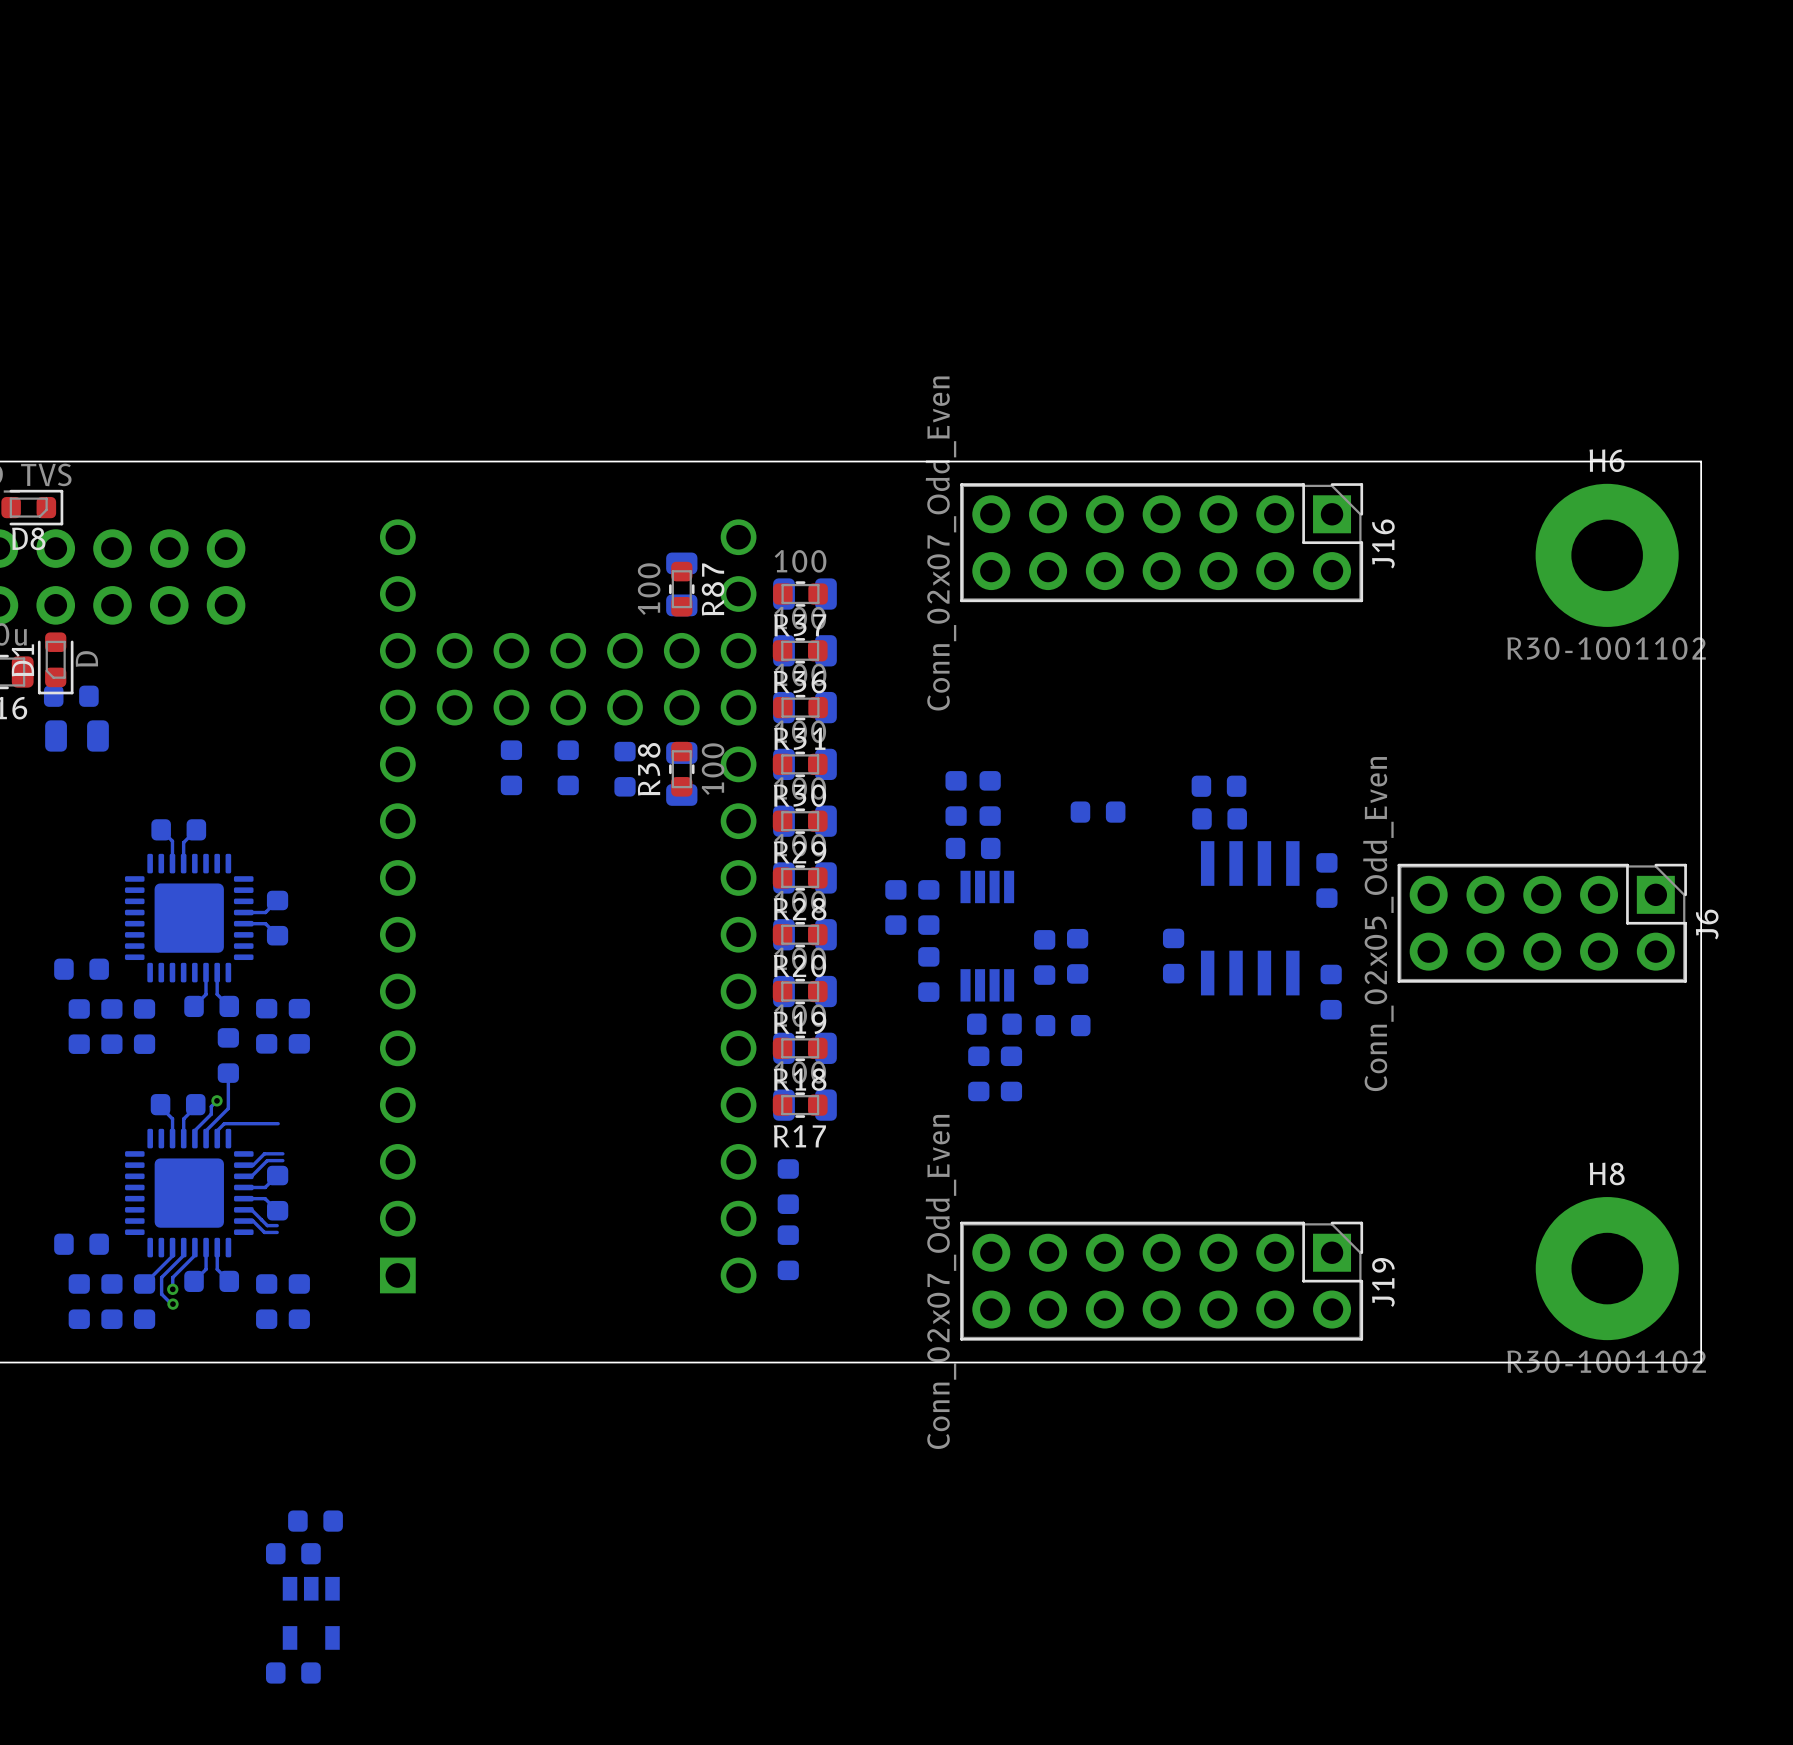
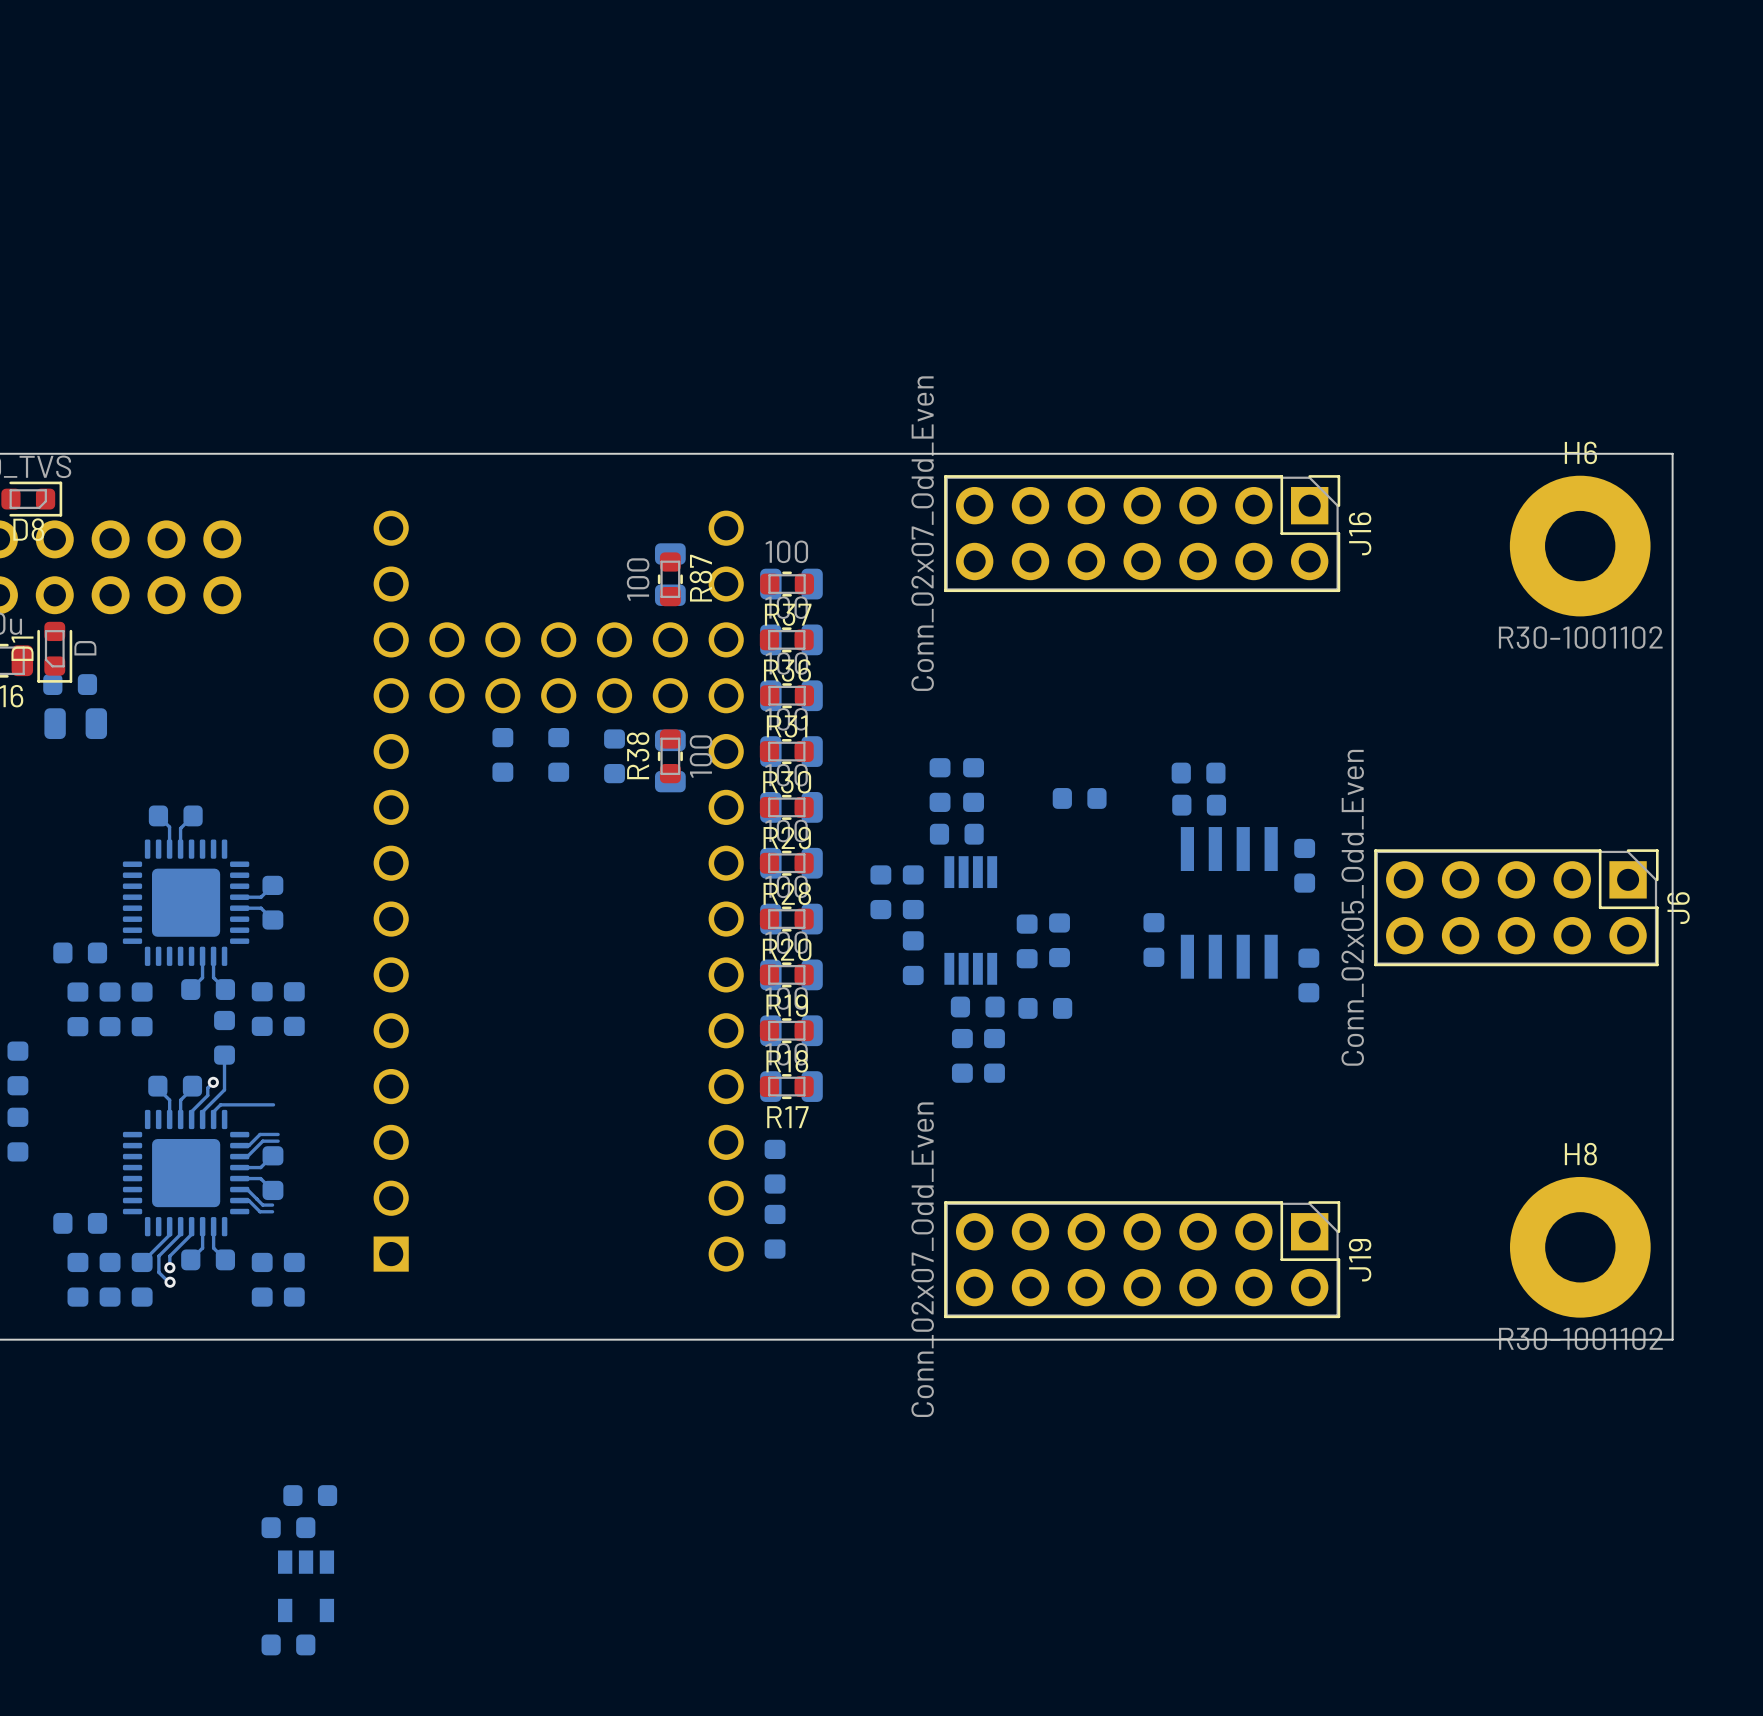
part: none -> (17, 1068)
part: none -> (17, 1134)

